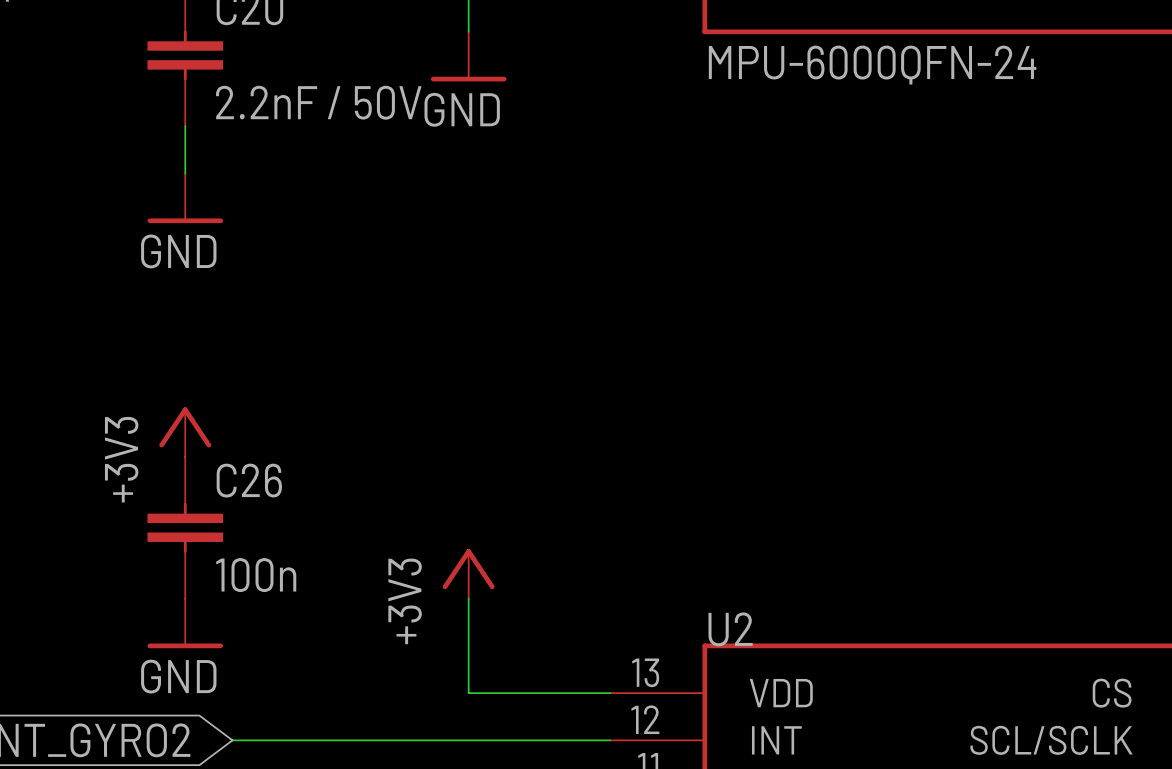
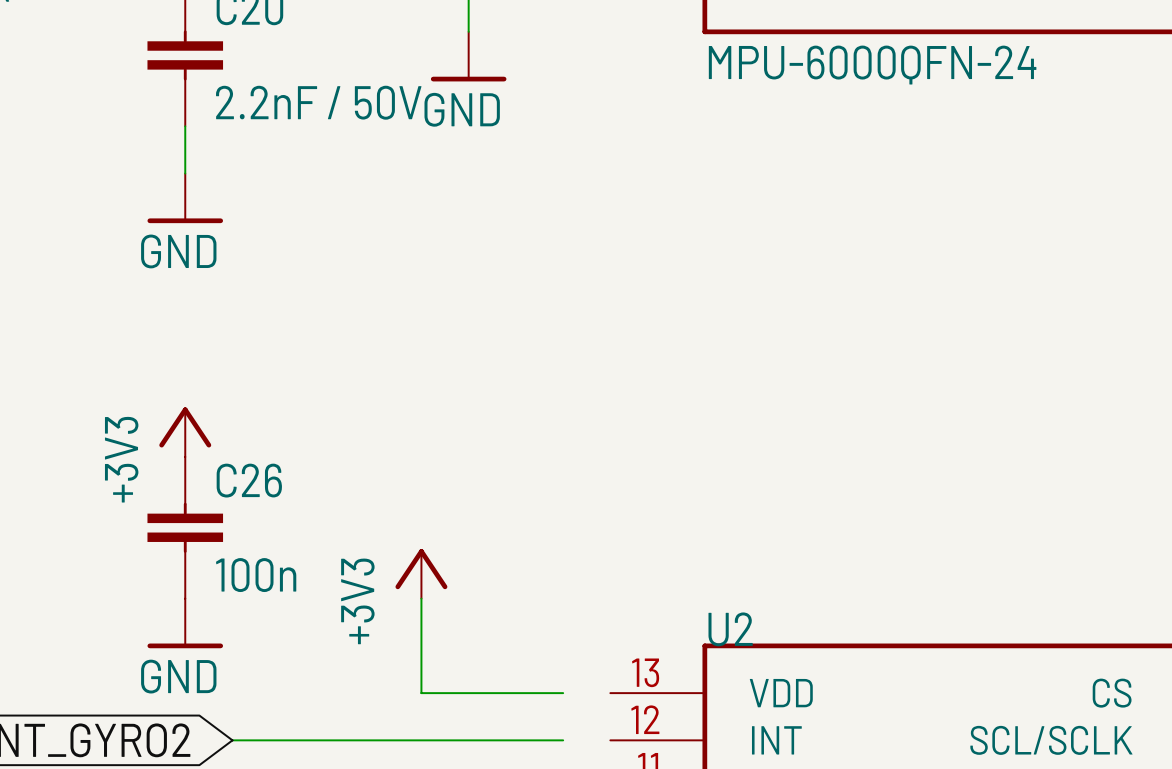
power symbol position: +3V3 (468, 573) -> +3V3 (421, 573)
wire: (468, 598) (468, 693) -> (421, 598) (421, 693) (468, 693)
wire: (563, 693) (610, 693) -> none
wire: (563, 740) (610, 740) -> none

